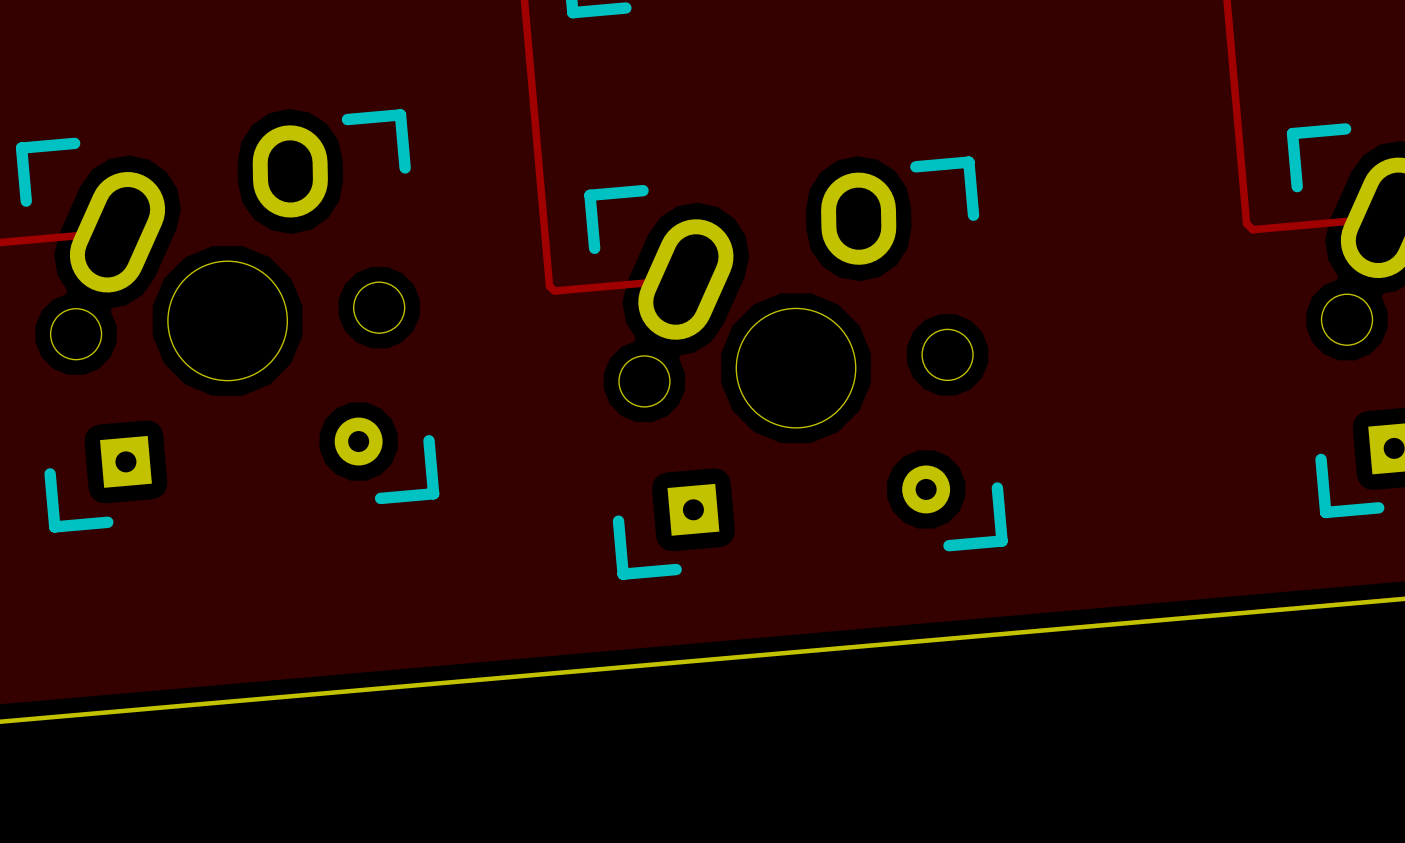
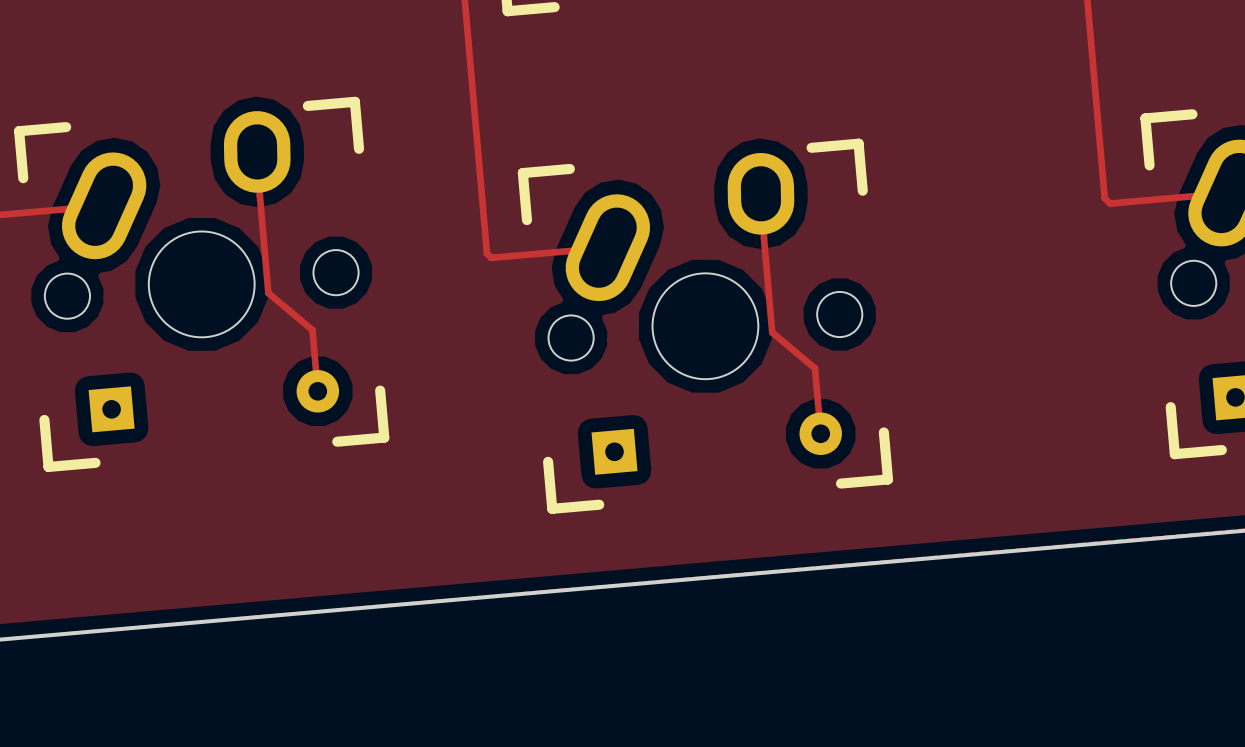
track: none -> (257, 151) (259, 154) (259, 195) (268, 293) (312, 330)
track: none -> (760, 193) (763, 196) (763, 238) (772, 332) (814, 368)
track: none -> (312, 330) (317, 391)
track: none -> (814, 368) (820, 433)

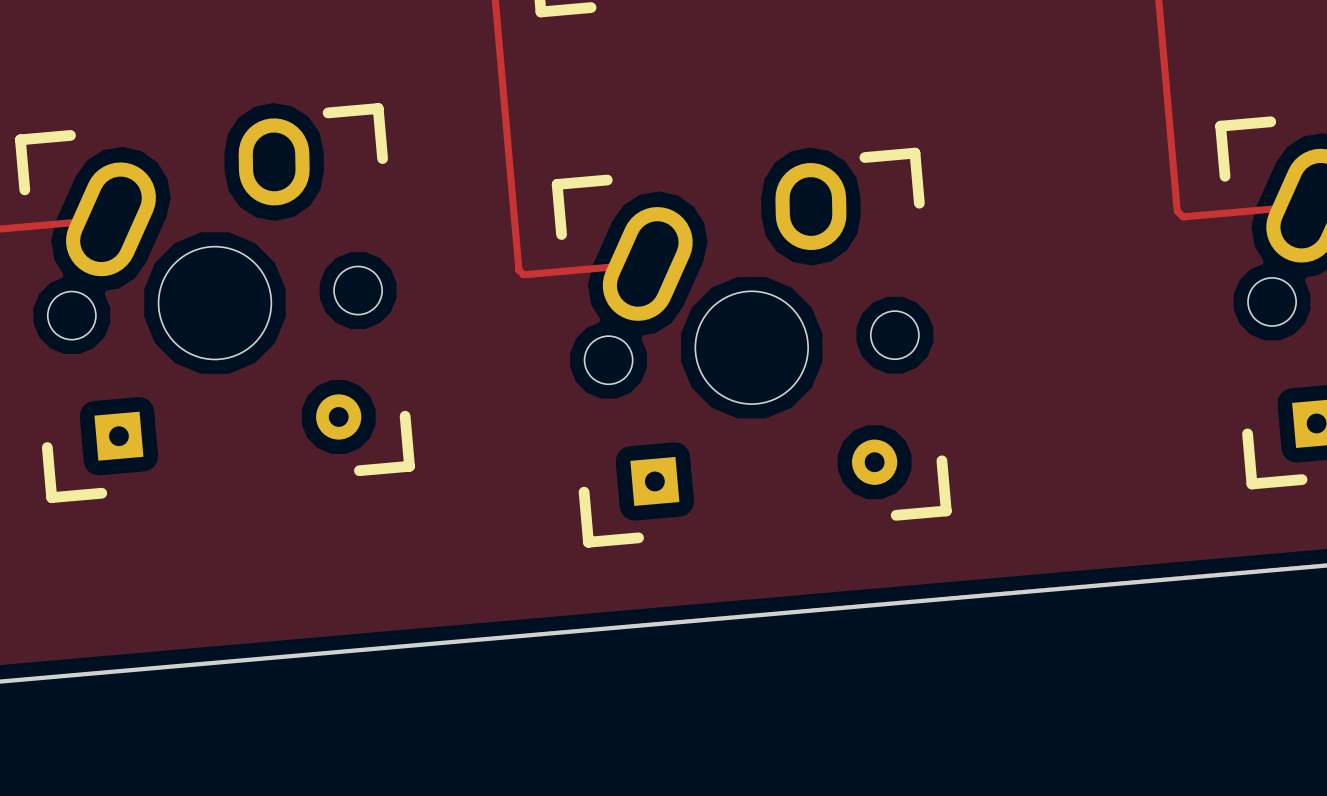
track: (257, 151) (259, 154) (259, 195) (268, 293) (312, 330) -> none
track: (760, 193) (763, 196) (763, 238) (772, 332) (814, 368) -> none
track: (312, 330) (317, 391) -> none
track: (814, 368) (820, 433) -> none

